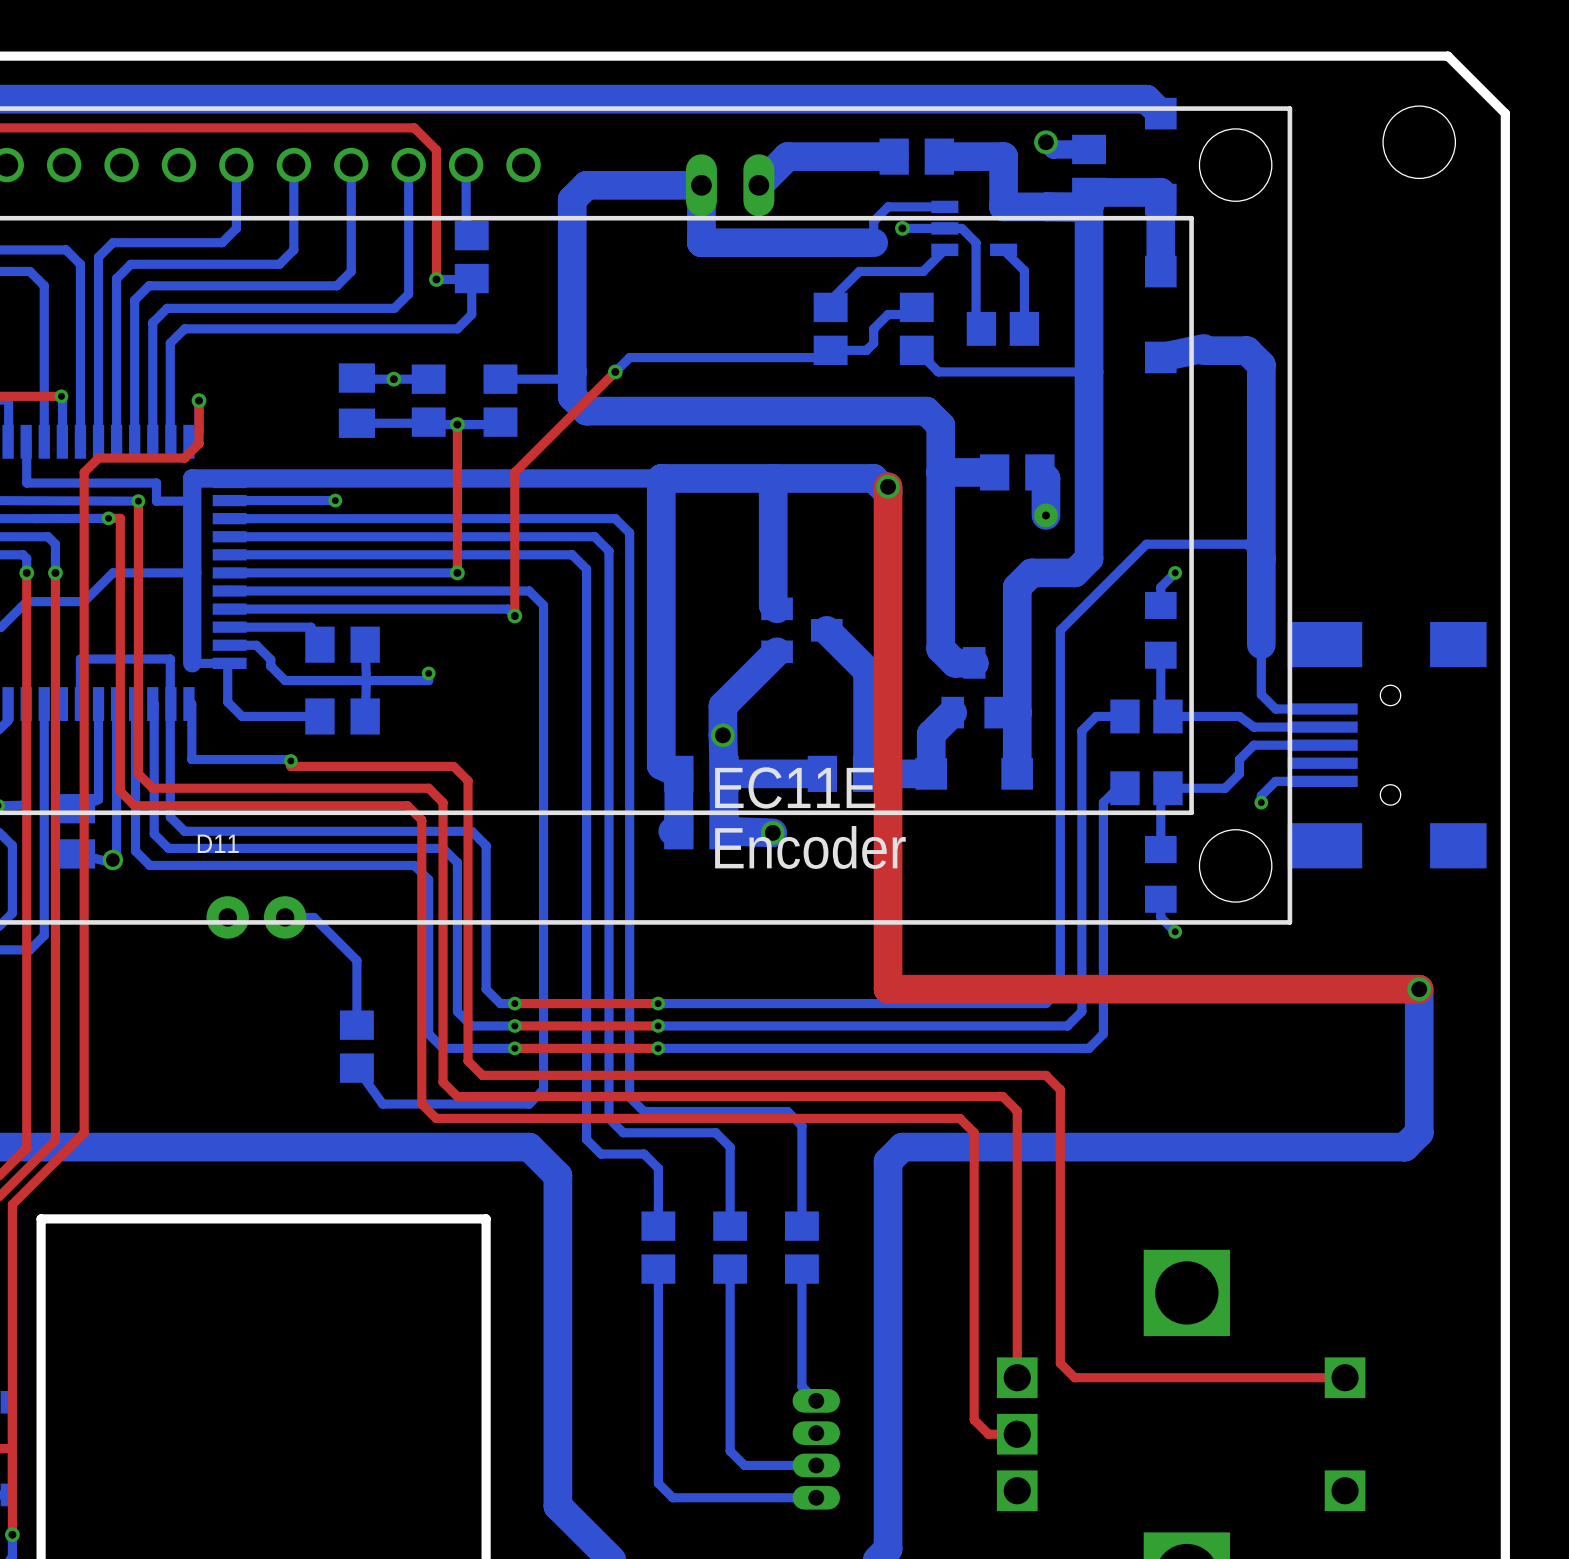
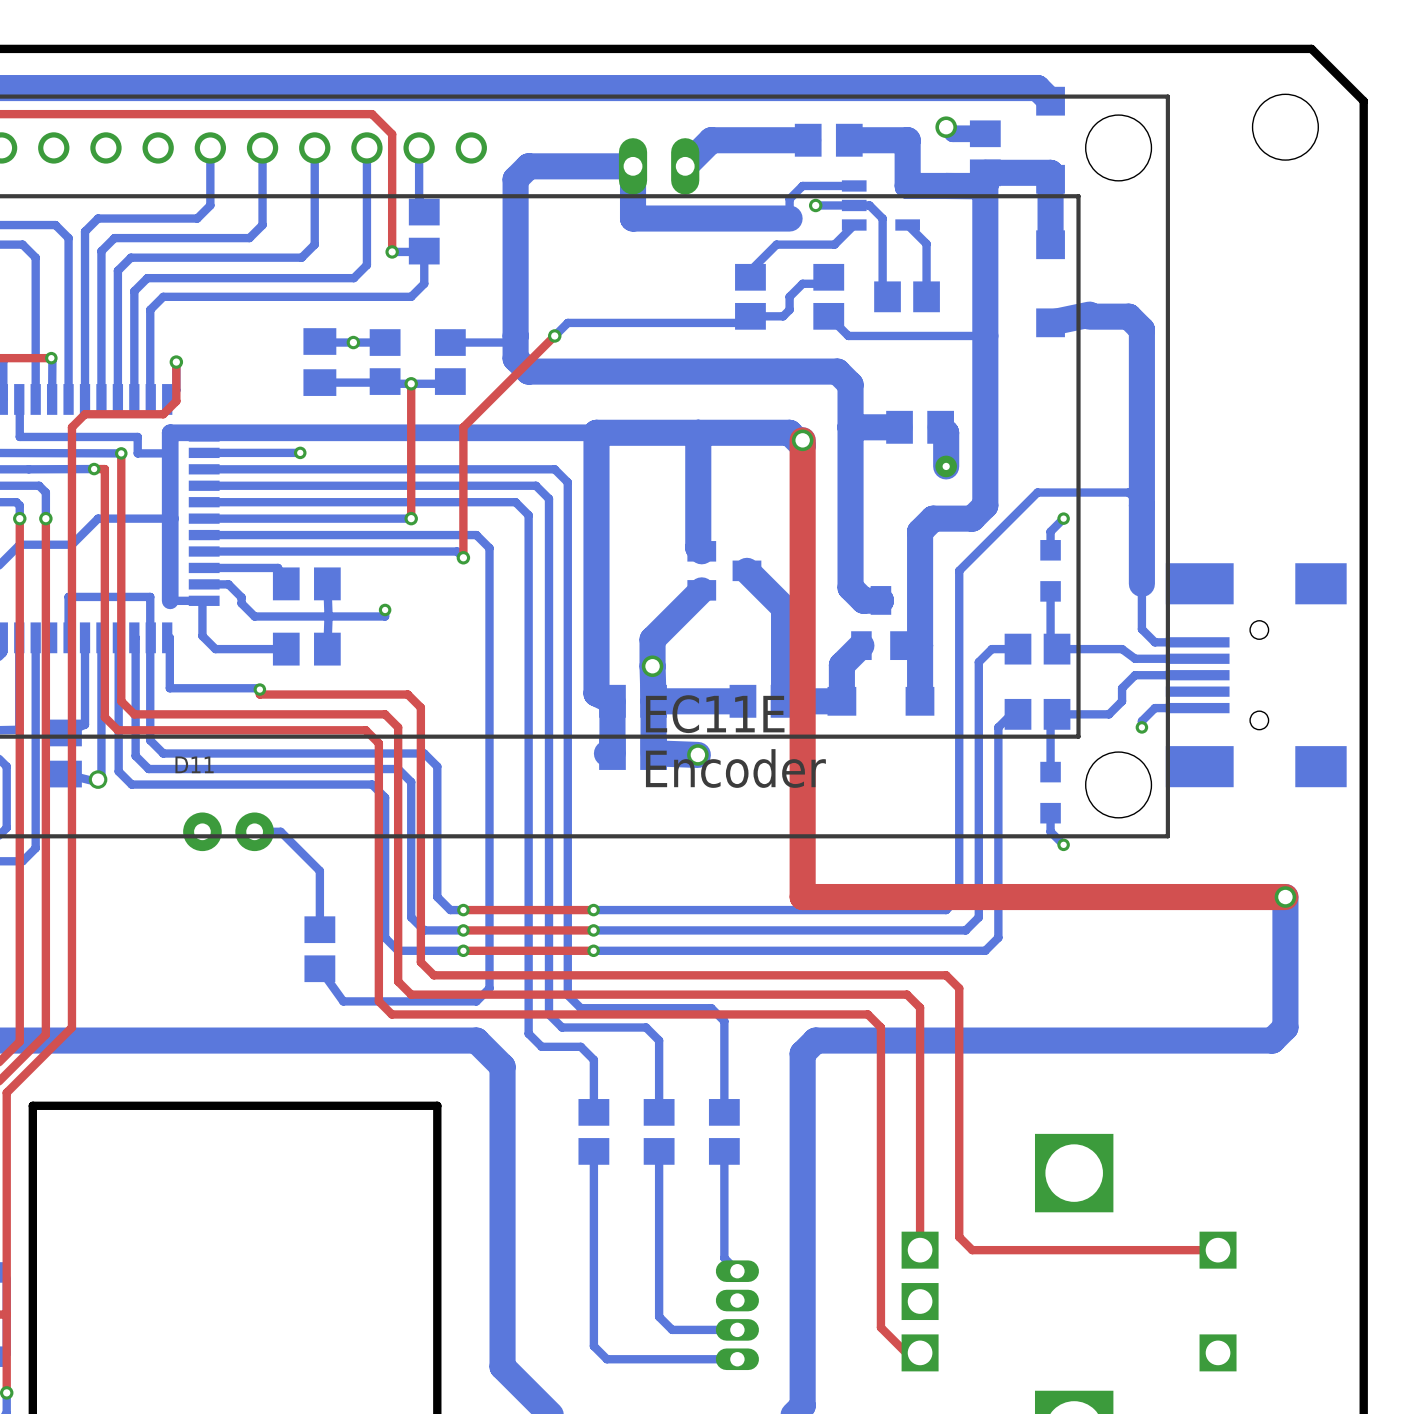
part footprint: [1145, 591, 1177, 669] -> [1040, 540, 1061, 602]
part footprint: [1145, 835, 1177, 913] -> [1040, 761, 1061, 824]
top track: (974, 1419) (988, 1434) (1017, 1434) -> (880, 1288) (880, 1327) (906, 1352) (920, 1352)

